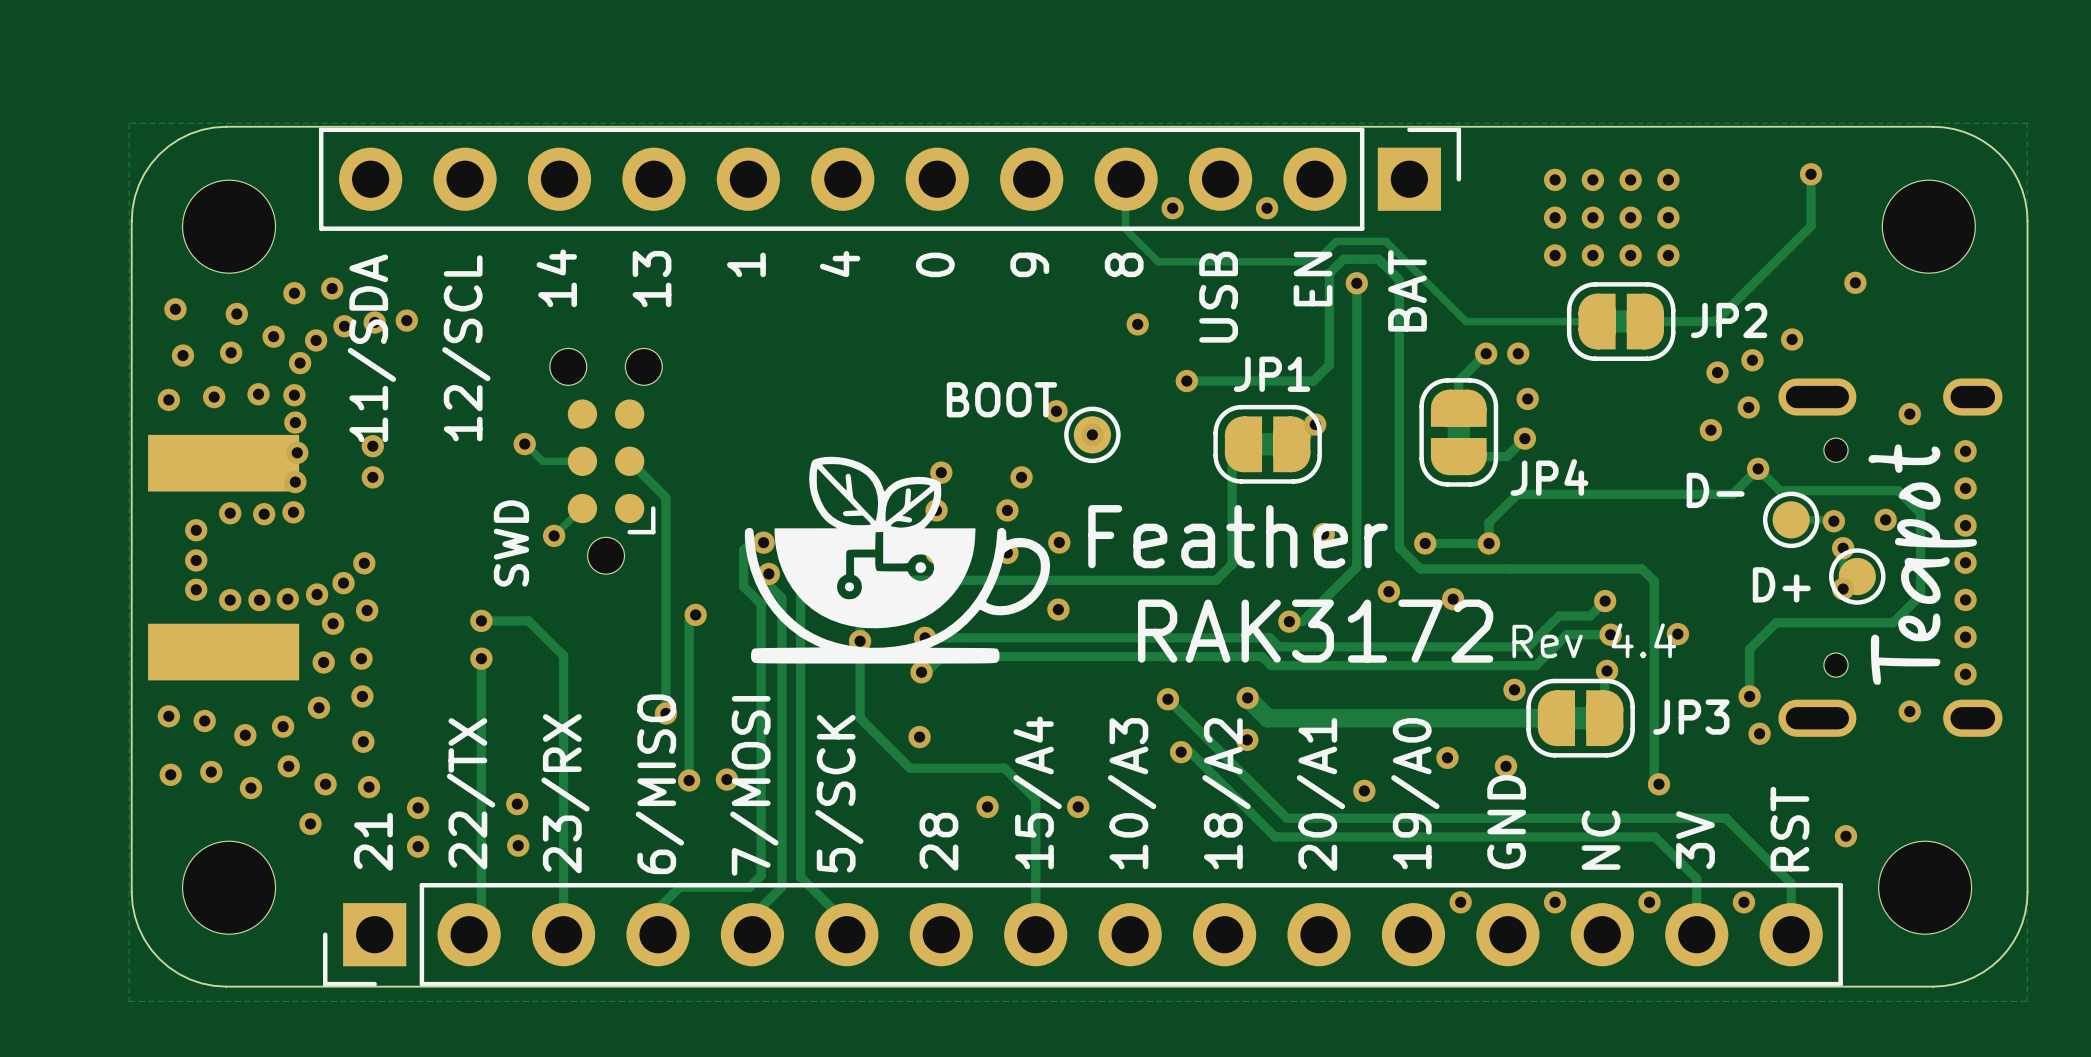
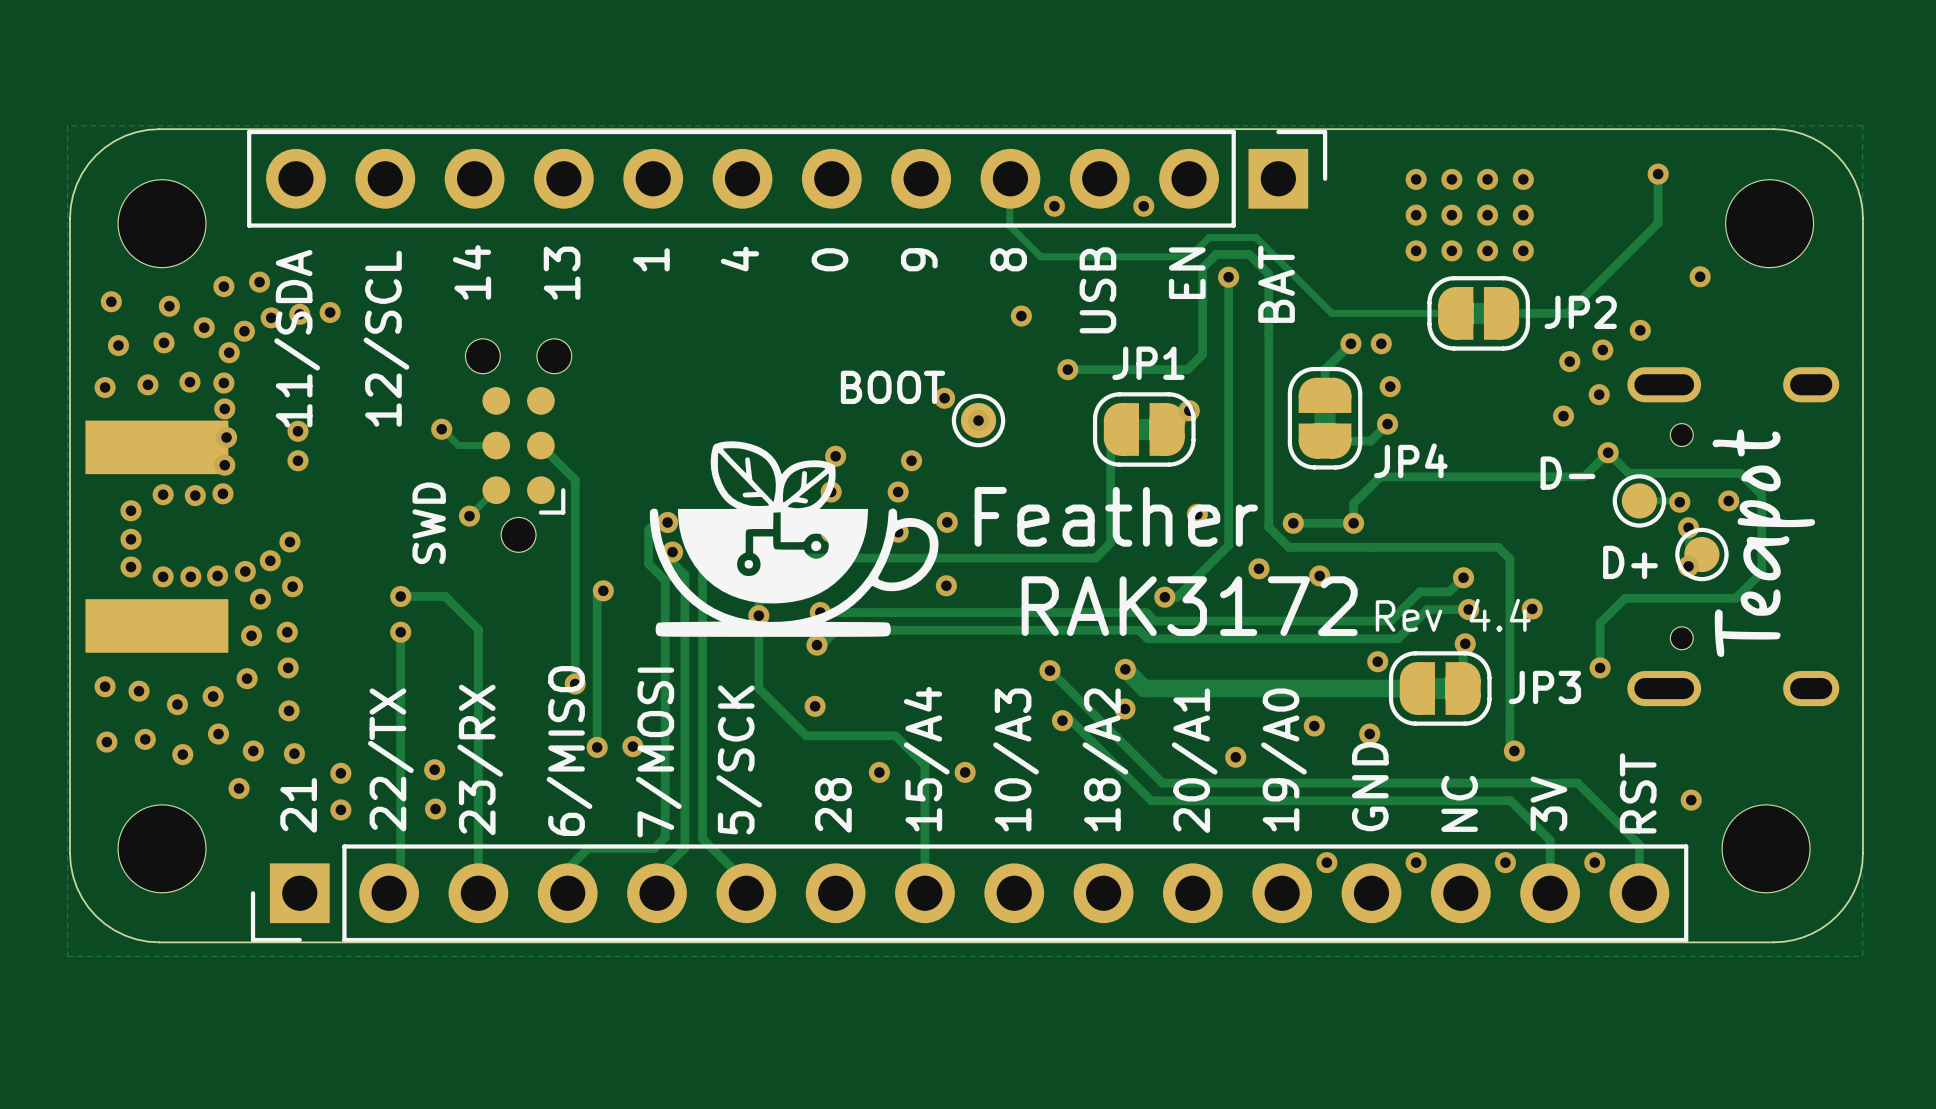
via: (1909, 414) -> none
via: (1965, 451) -> none
via: (1965, 488) -> none
via: (1965, 525) -> none
via: (1965, 562) -> none
via: (1965, 599) -> none
via: (1965, 637) -> none
via: (1965, 674) -> none
via: (1909, 711) -> none
via: (1759, 733) -> none

